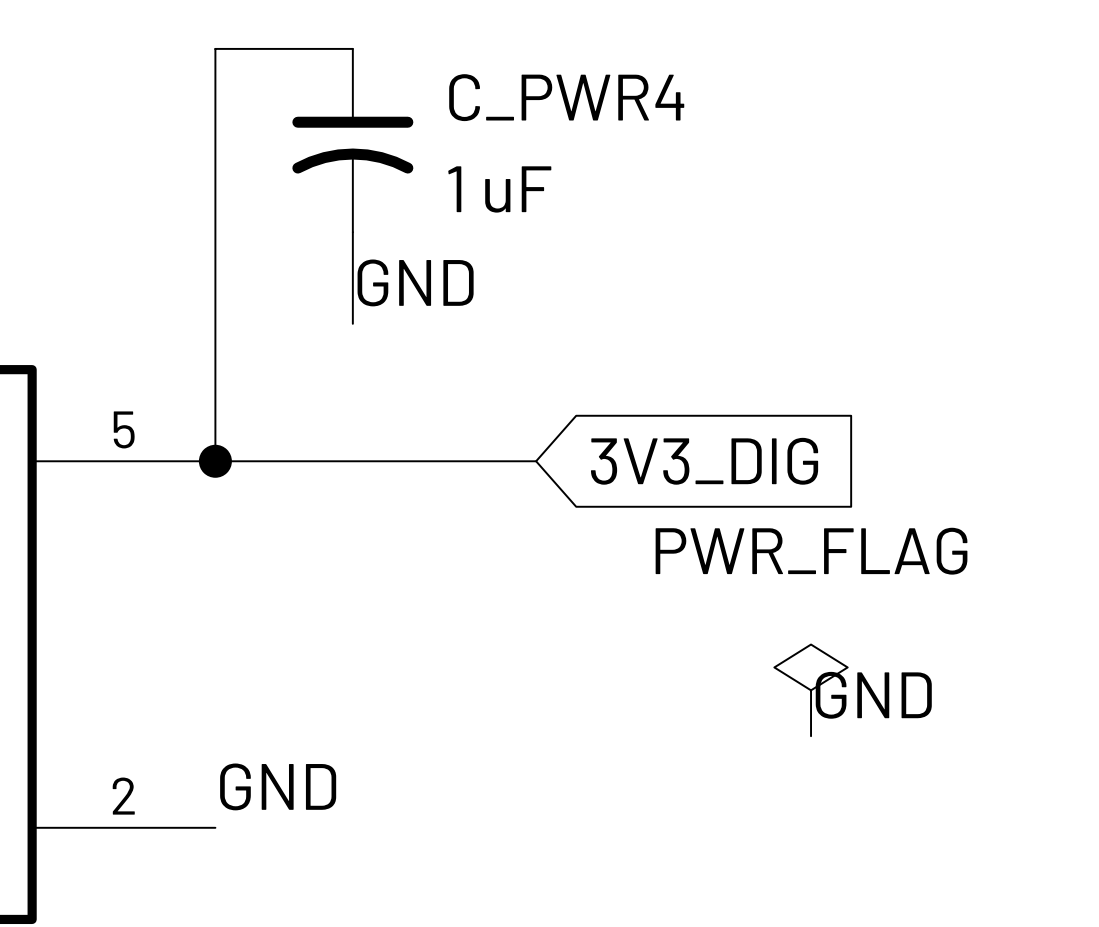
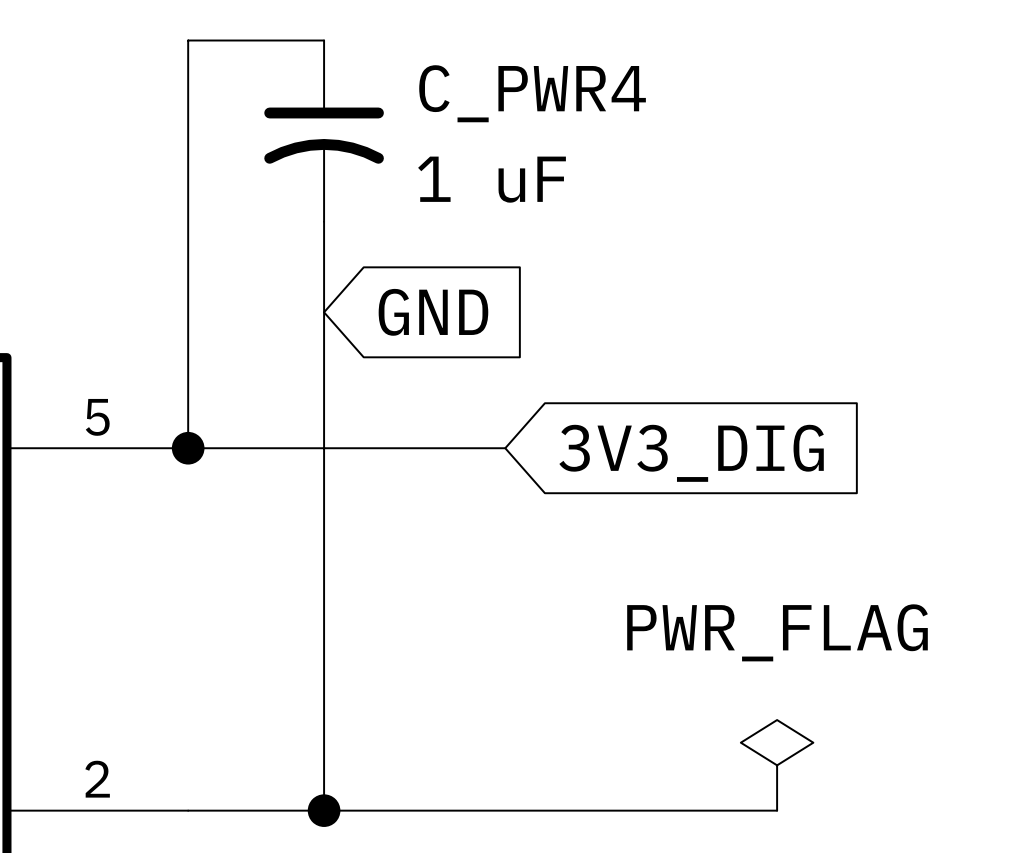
label: GND (415, 282) -> none
wire: none -> (324, 312) (324, 810)
global label: none -> GND (433, 312)
power symbol position: PWR_FLAG (811, 690) -> PWR_FLAG (777, 765)
label: GND (873, 695) -> none
label: GND (278, 786) -> none
wire: none -> (188, 810) (777, 810)
junction: none -> (324, 810)

